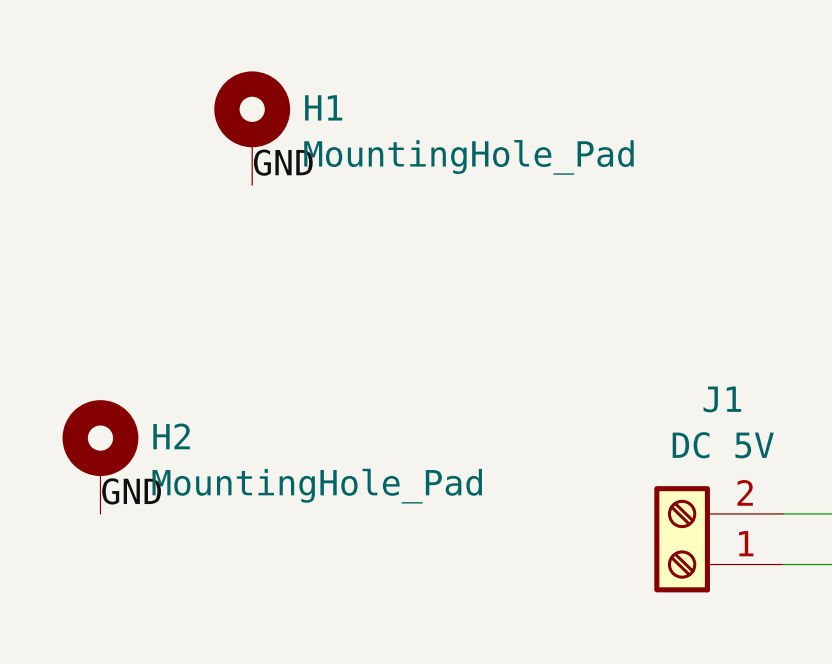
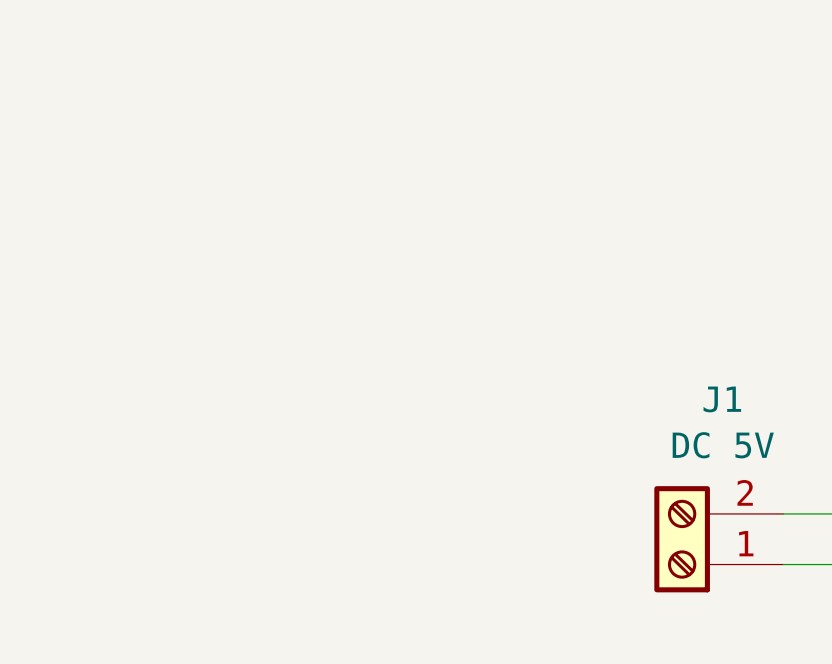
H1: MountingHole_Pad (252, 128) -> none
label: GND (283, 162) -> none
H2: MountingHole_Pad (100, 457) -> none
label: GND (131, 491) -> none

